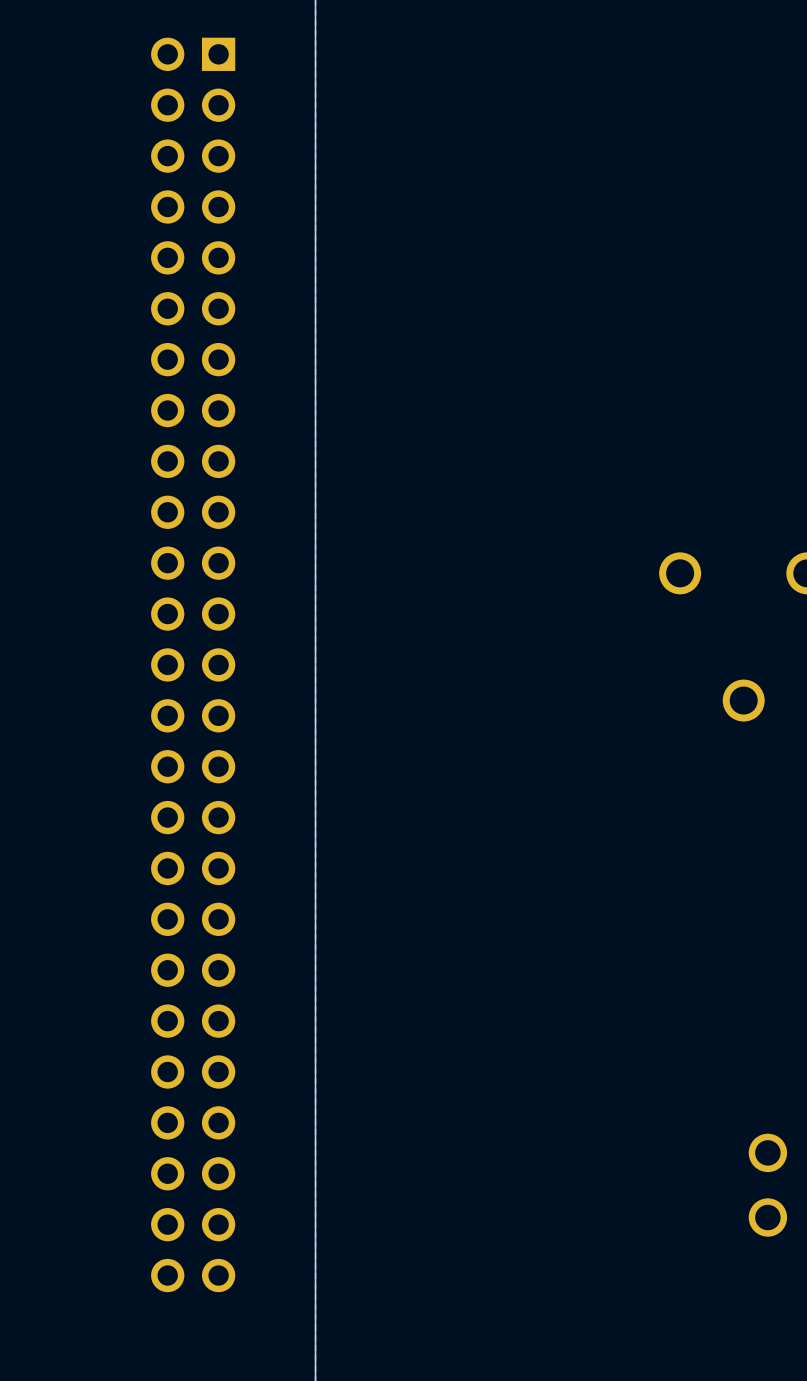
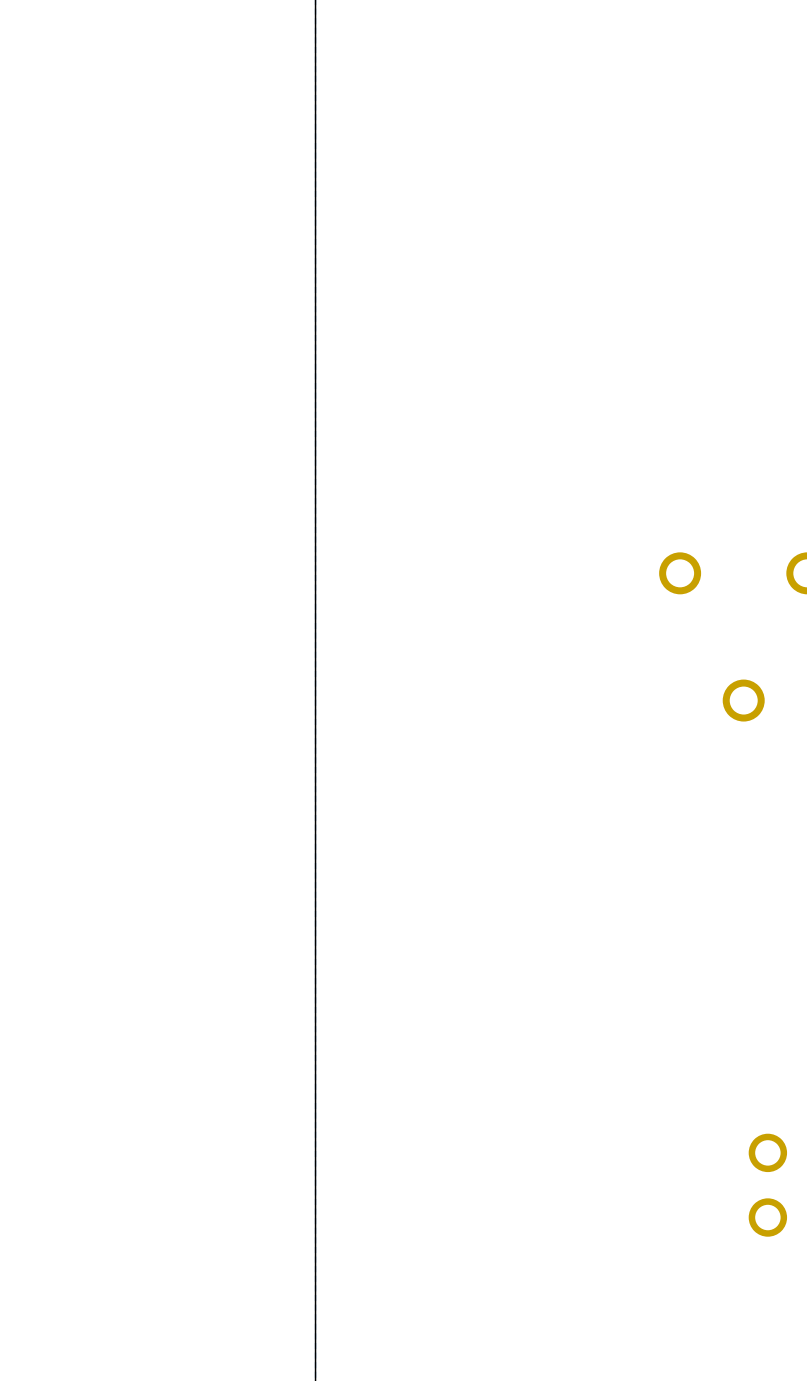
part: (193, 664) -> none

